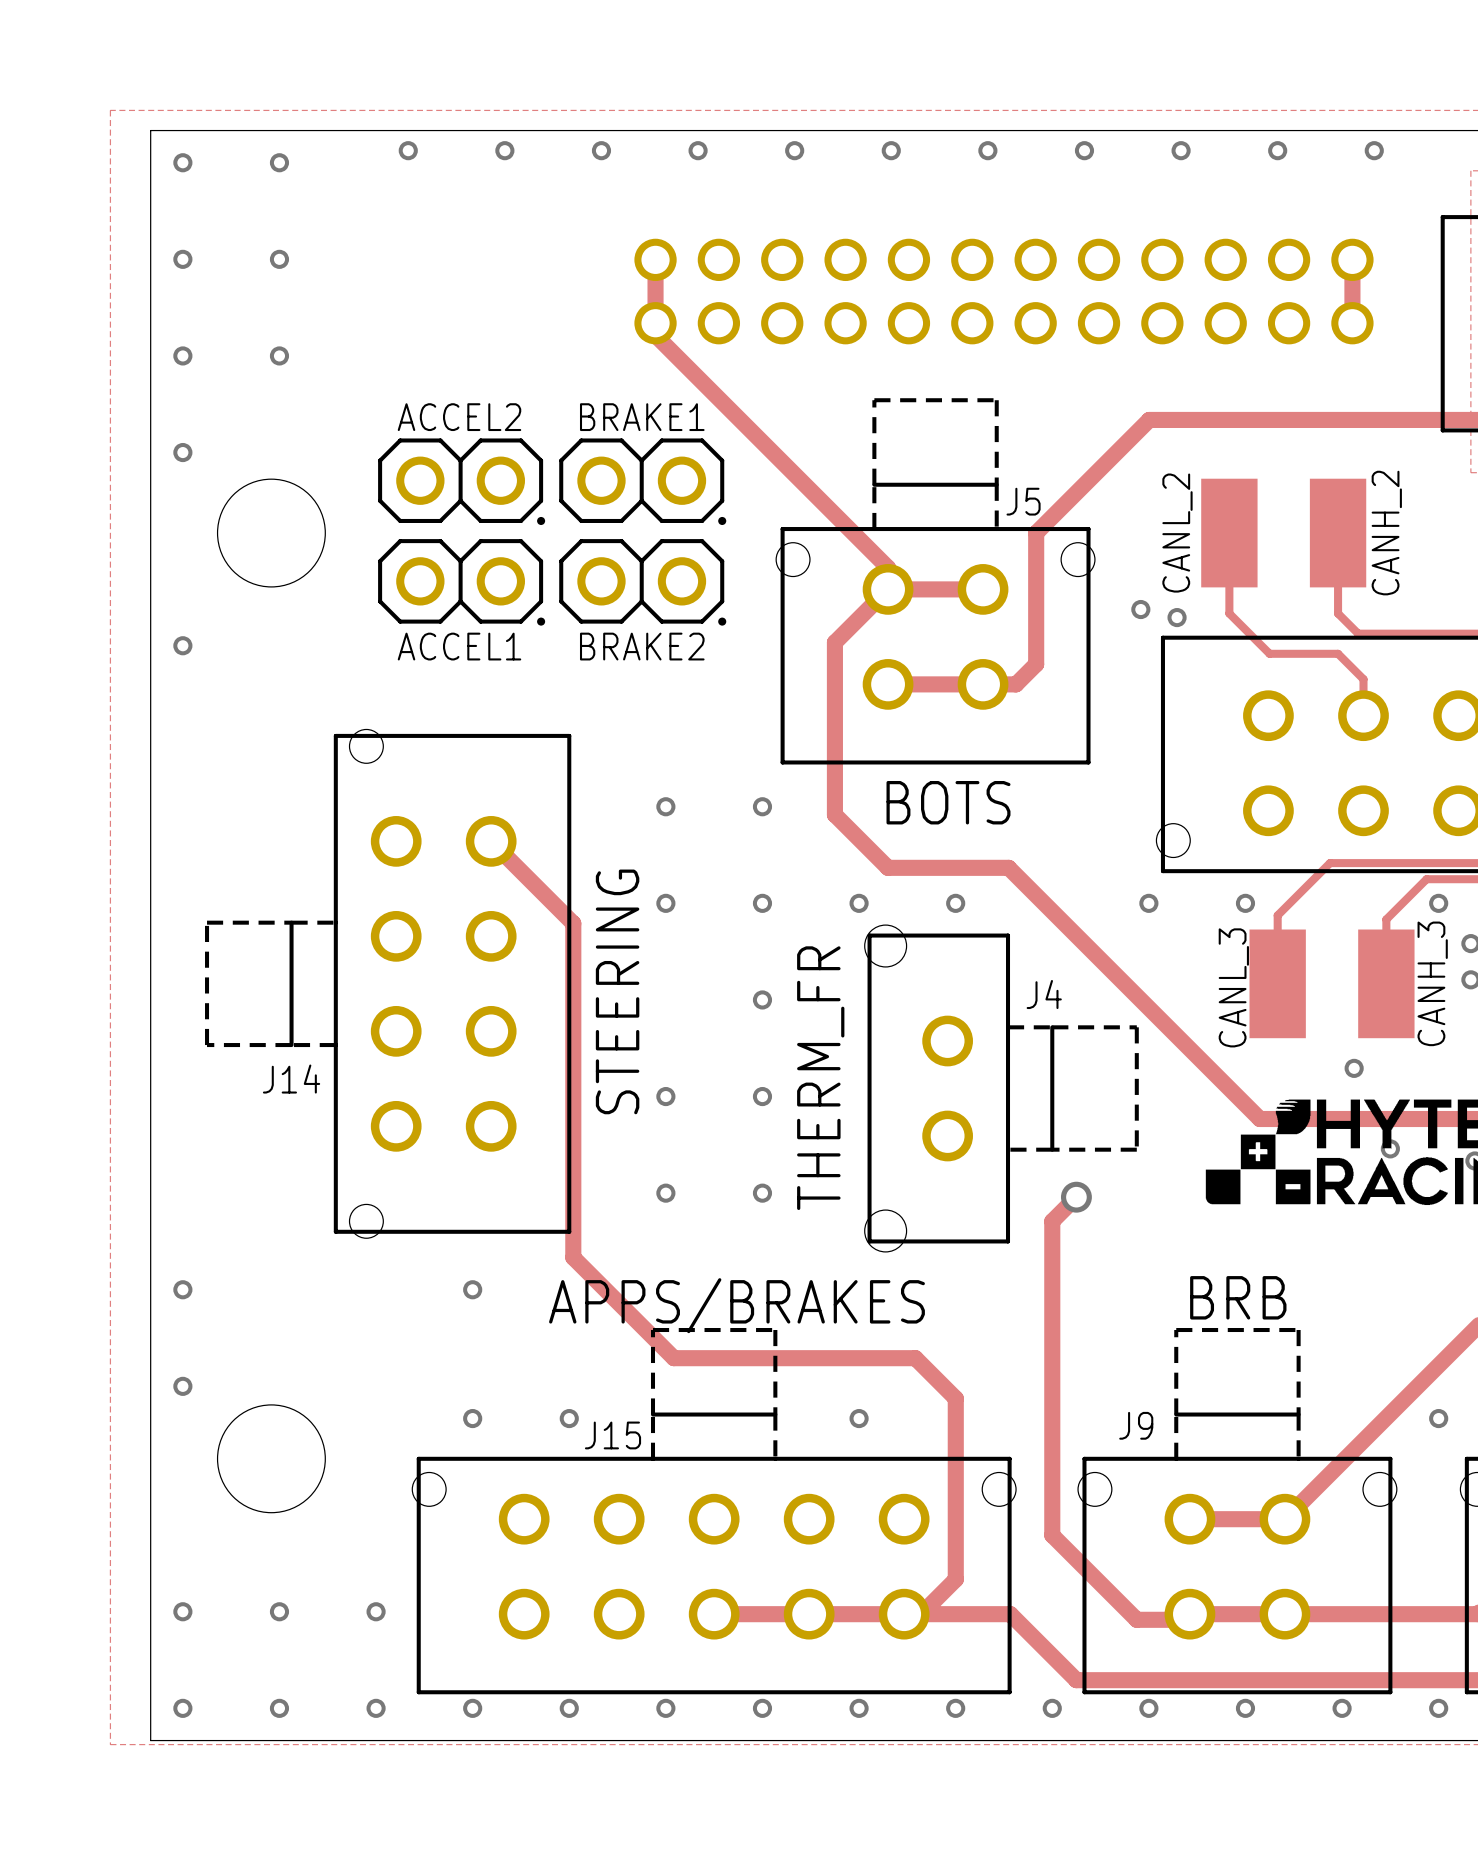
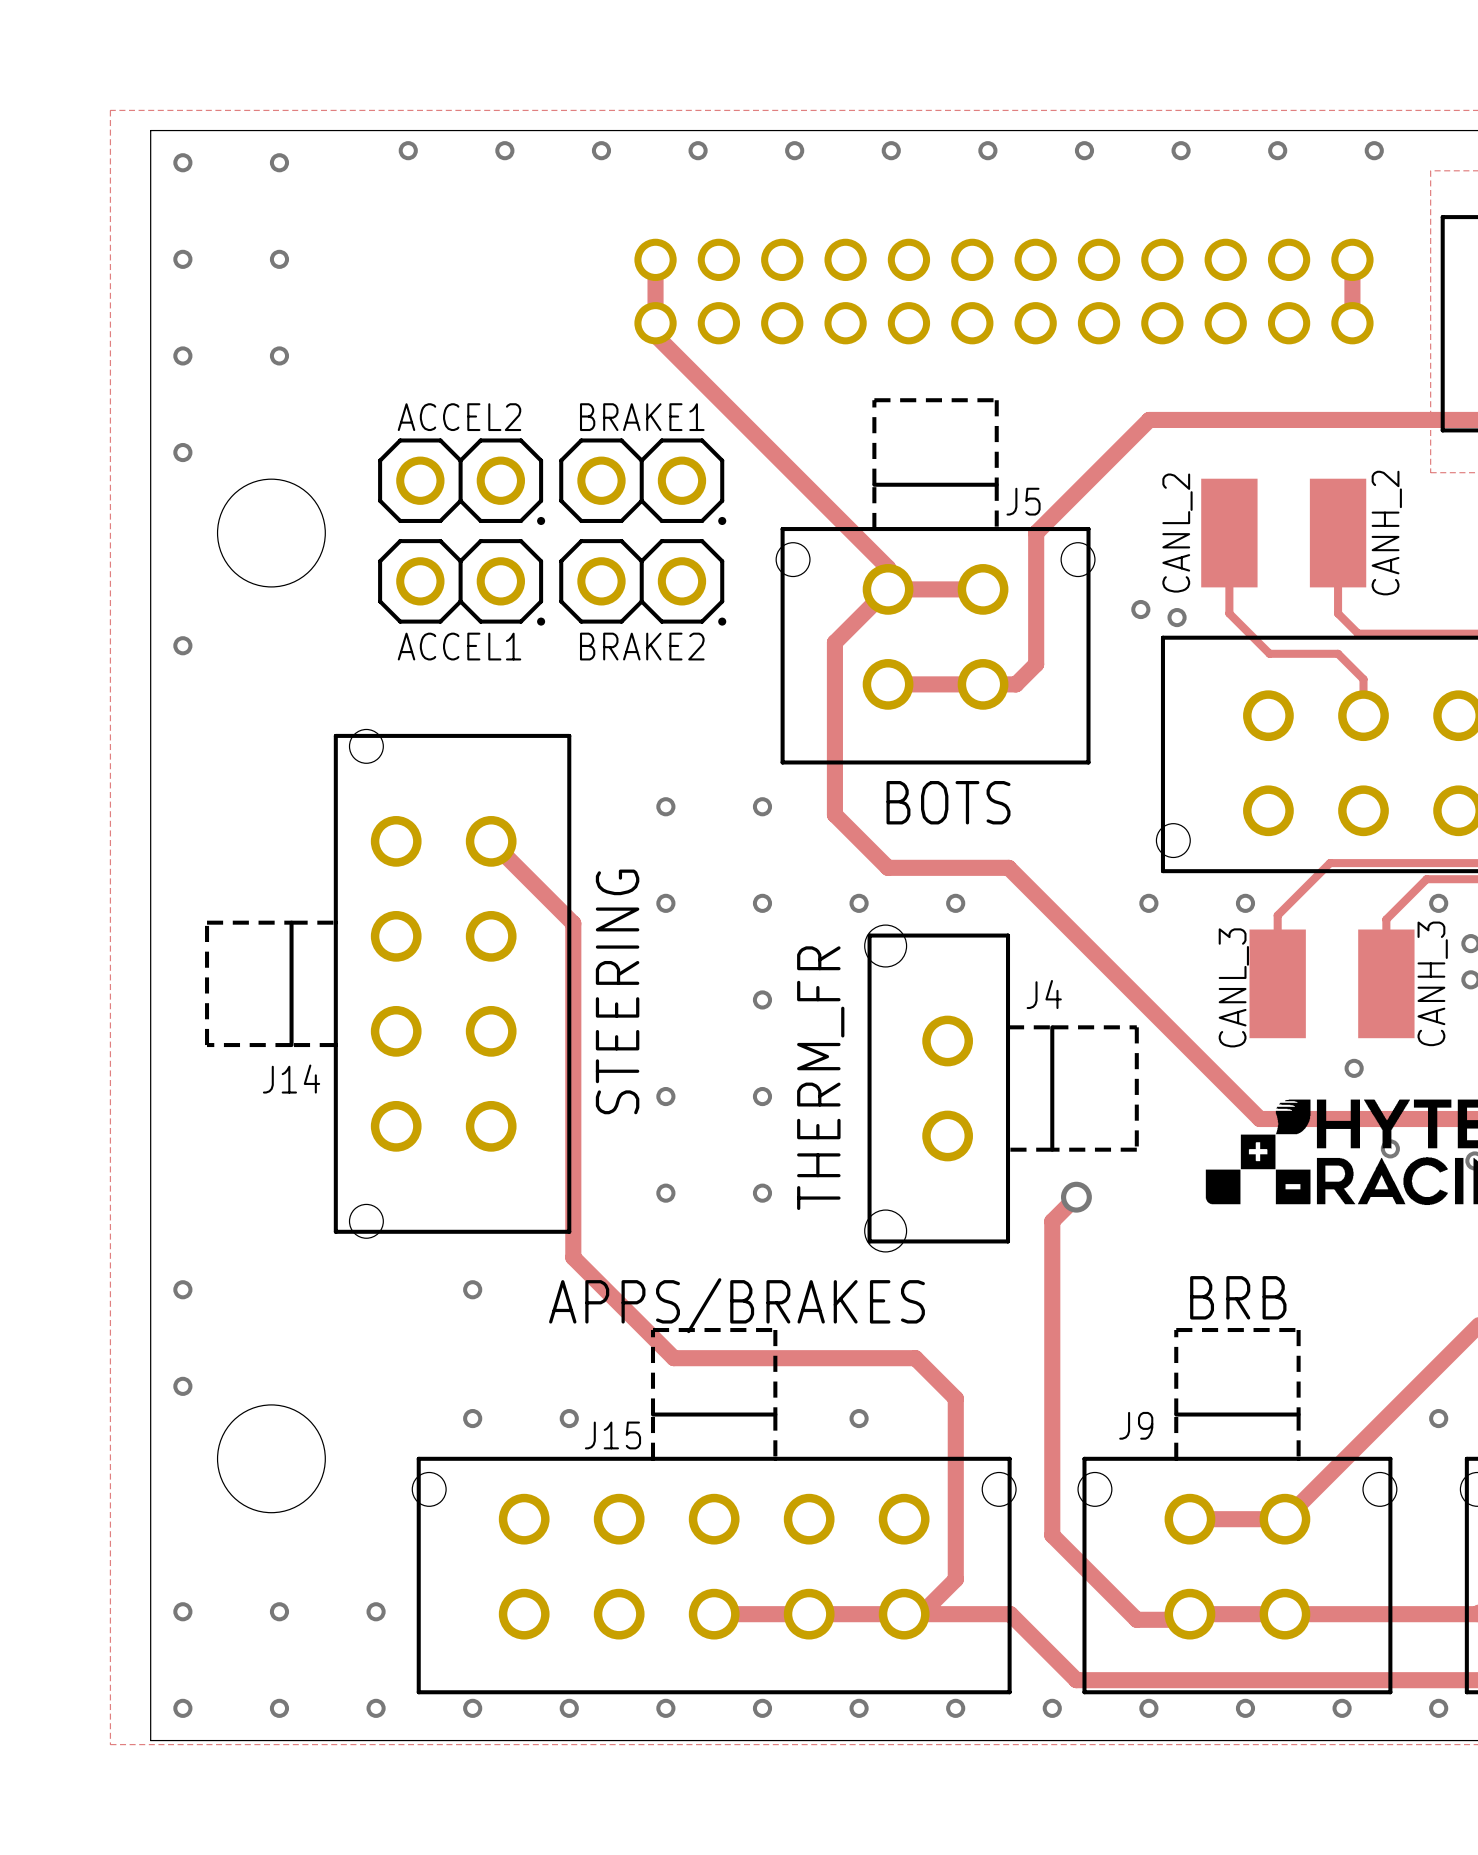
zone outline: (1470, 170) (1470, 472) -> (1470, 170) (1430, 170) (1430, 472) (1470, 472)

